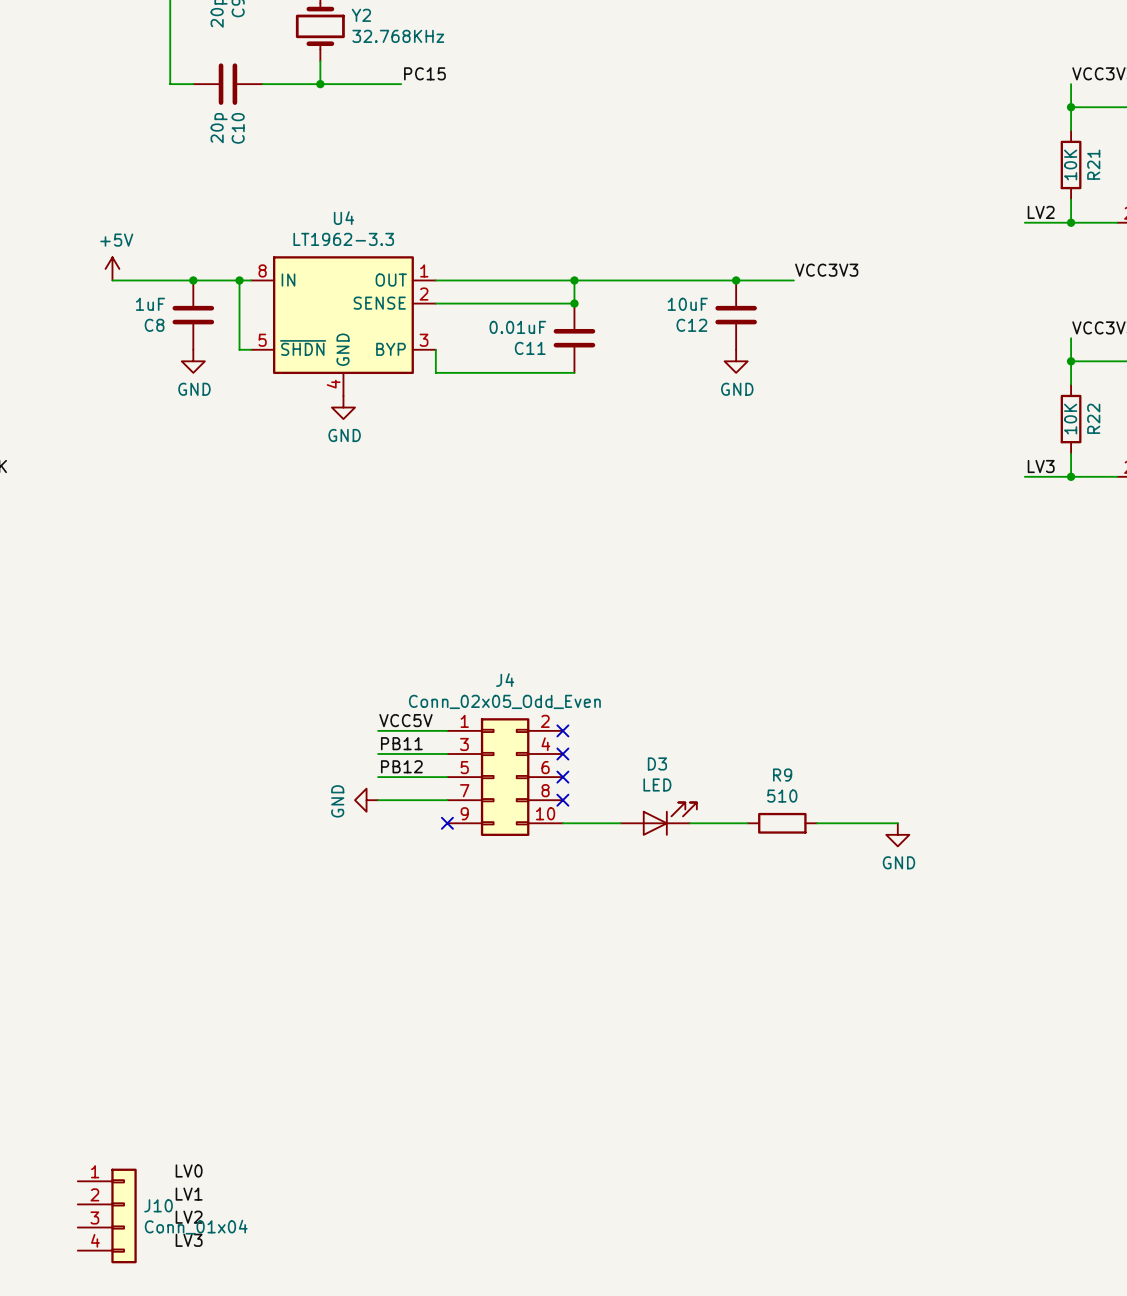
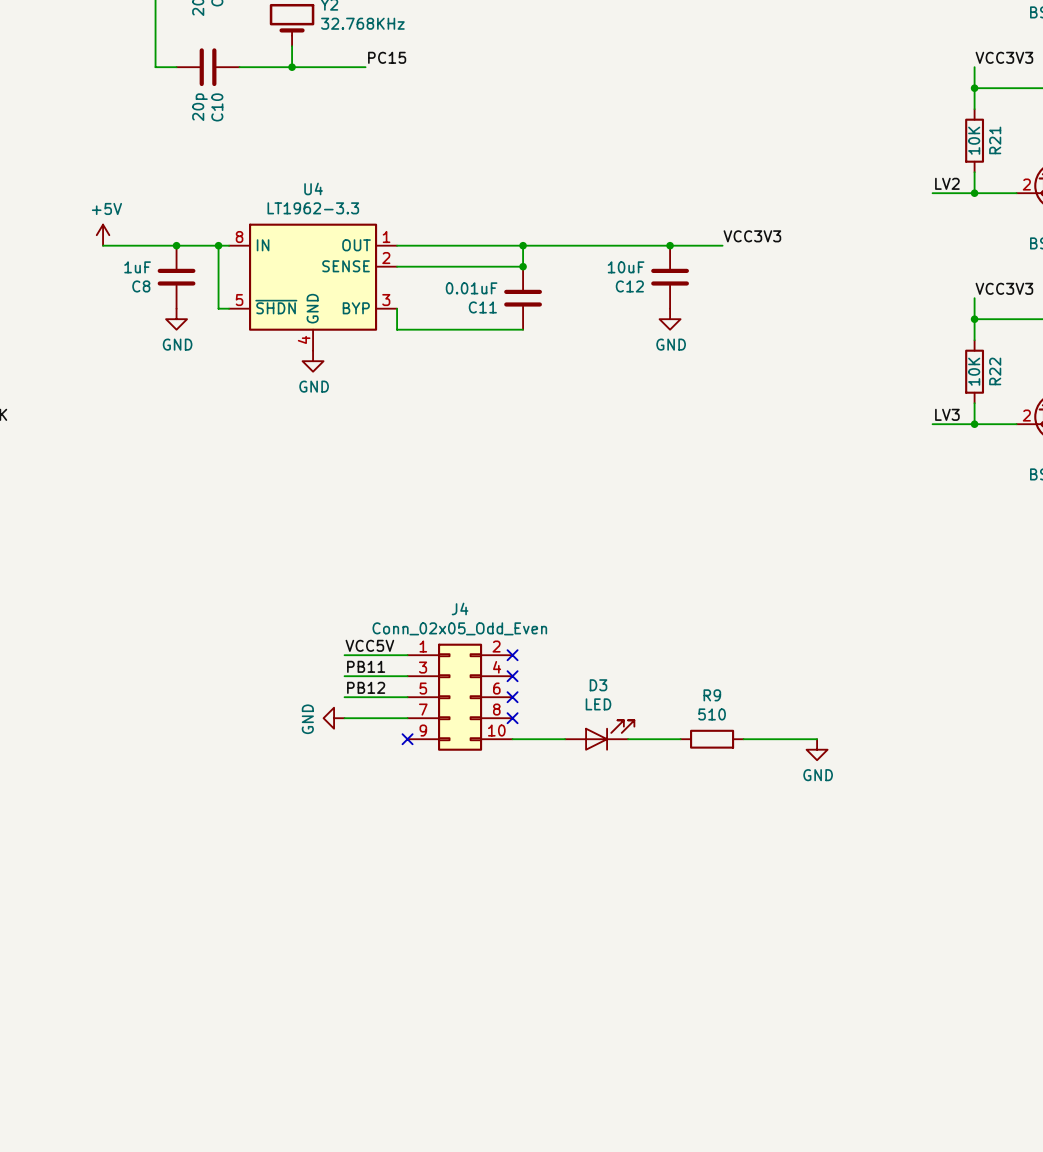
label: LV0 (189, 1171) -> none
label: LV1 (189, 1194) -> none
J10: Conn_01x04 (107, 1215) -> none
label: LV2 (189, 1217) -> none
label: LV3 (189, 1240) -> none

